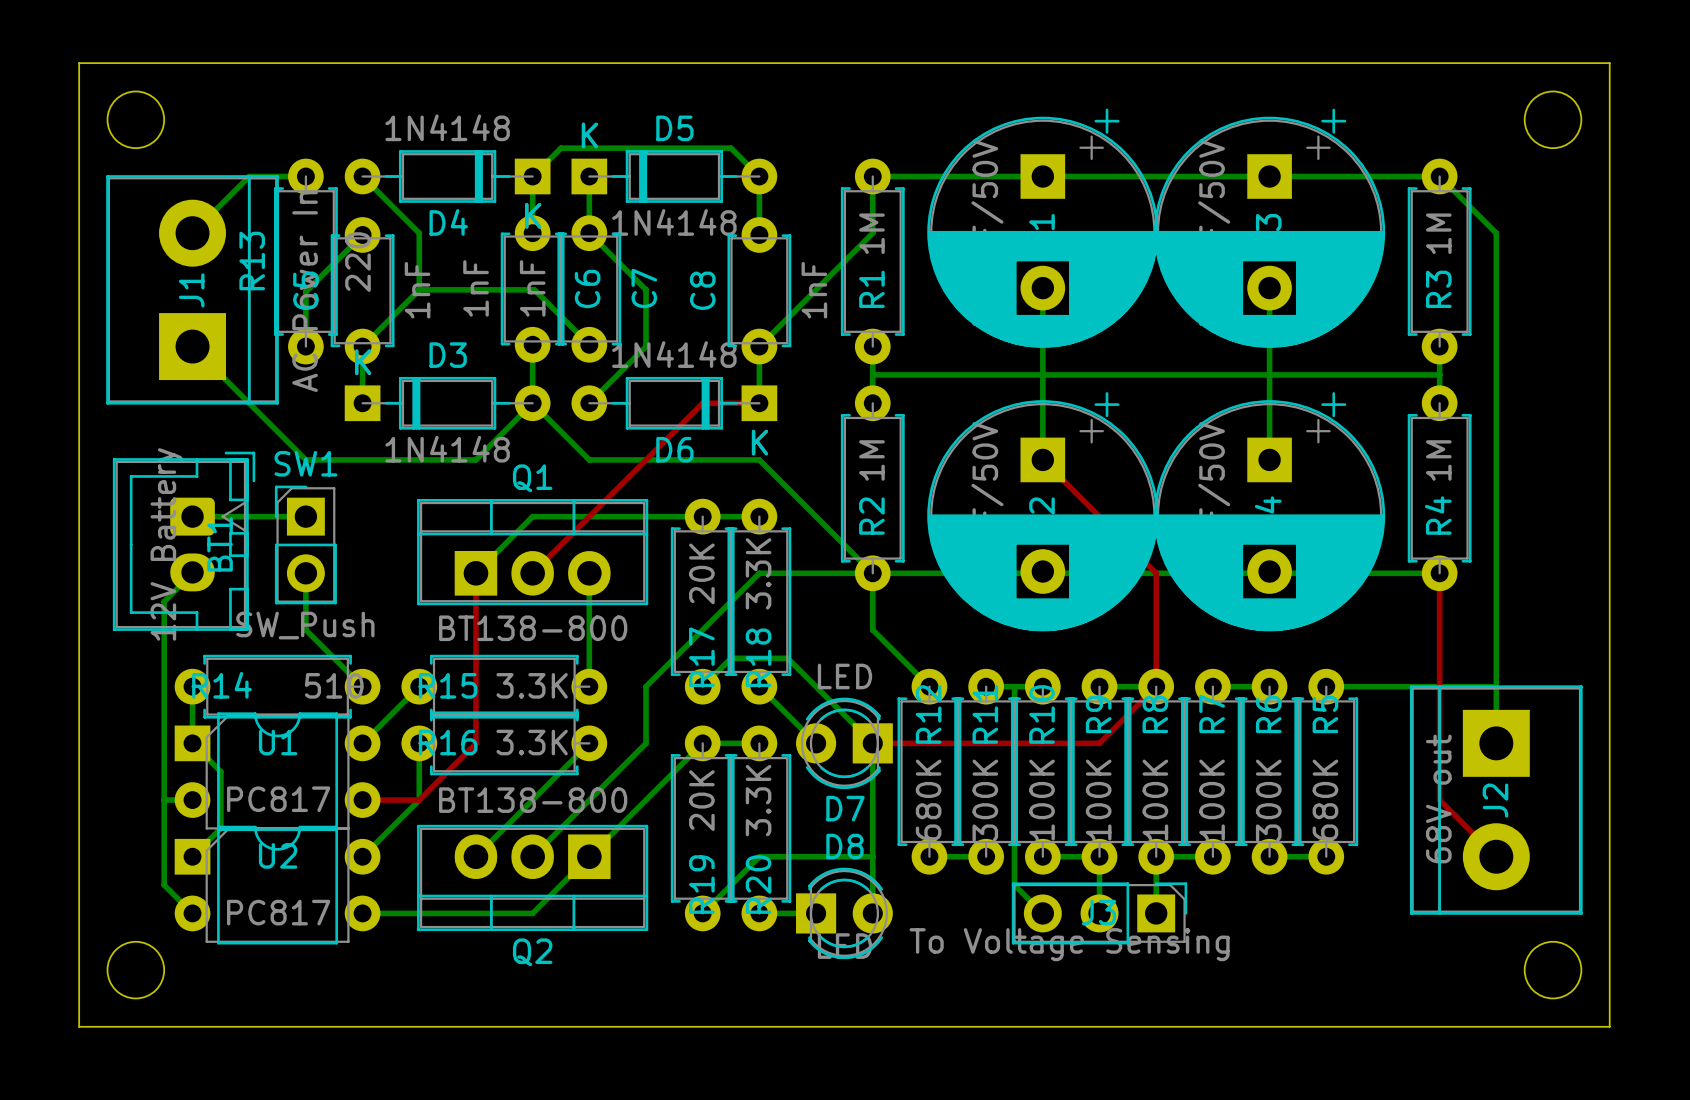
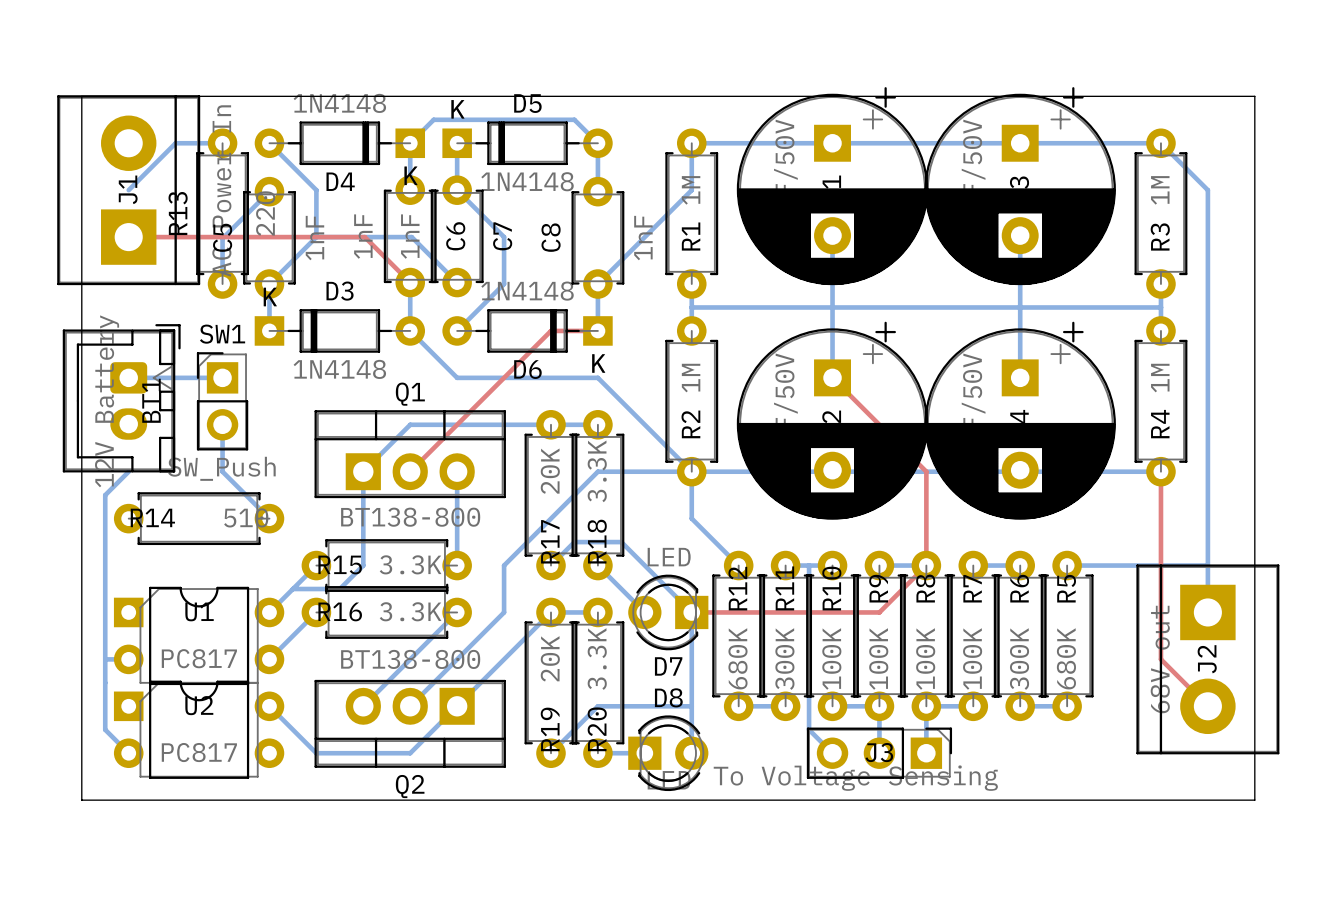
board edge: (79, 63) (79, 1026) (1609, 1026) (1609, 63) (79, 63) -> (81, 96) (81, 800) (1254, 800) (1254, 96) (81, 96)
round board edge: [106, 90, 165, 149] -> none
round board edge: [1524, 90, 1582, 149] -> none
top track: none -> (128, 237) (364, 237) (410, 282)
J1 position: (192, 289) -> (128, 190)
bottom track: (192, 346) (305, 459) (475, 459) (532, 403) -> none
bottom track: none -> (128, 377) (222, 377)
bottom track: (192, 516) (305, 516) -> (269, 518) (222, 471) (222, 424)
BT1 position: (184, 541) -> (121, 398)
SW1 position: (305, 544) -> (222, 401)
bottom track: (305, 573) (305, 629) (362, 686) -> none
bottom track: none -> (363, 471) (363, 565) (339, 589) (292, 589)
top track: (475, 573) (475, 743) (419, 800) (362, 800) -> none
bottom track: (192, 686) (192, 743) (220, 771) (220, 828) (192, 856) -> none
R14 position: (277, 686) -> (199, 518)
bottom track: (419, 743) (419, 800) (362, 856) -> (316, 612) (269, 659)
bottom track: (362, 913) (419, 913) -> (269, 706) (316, 753)
round board edge: [106, 941, 165, 1000] -> none
round board edge: [1524, 941, 1582, 1000] -> none

